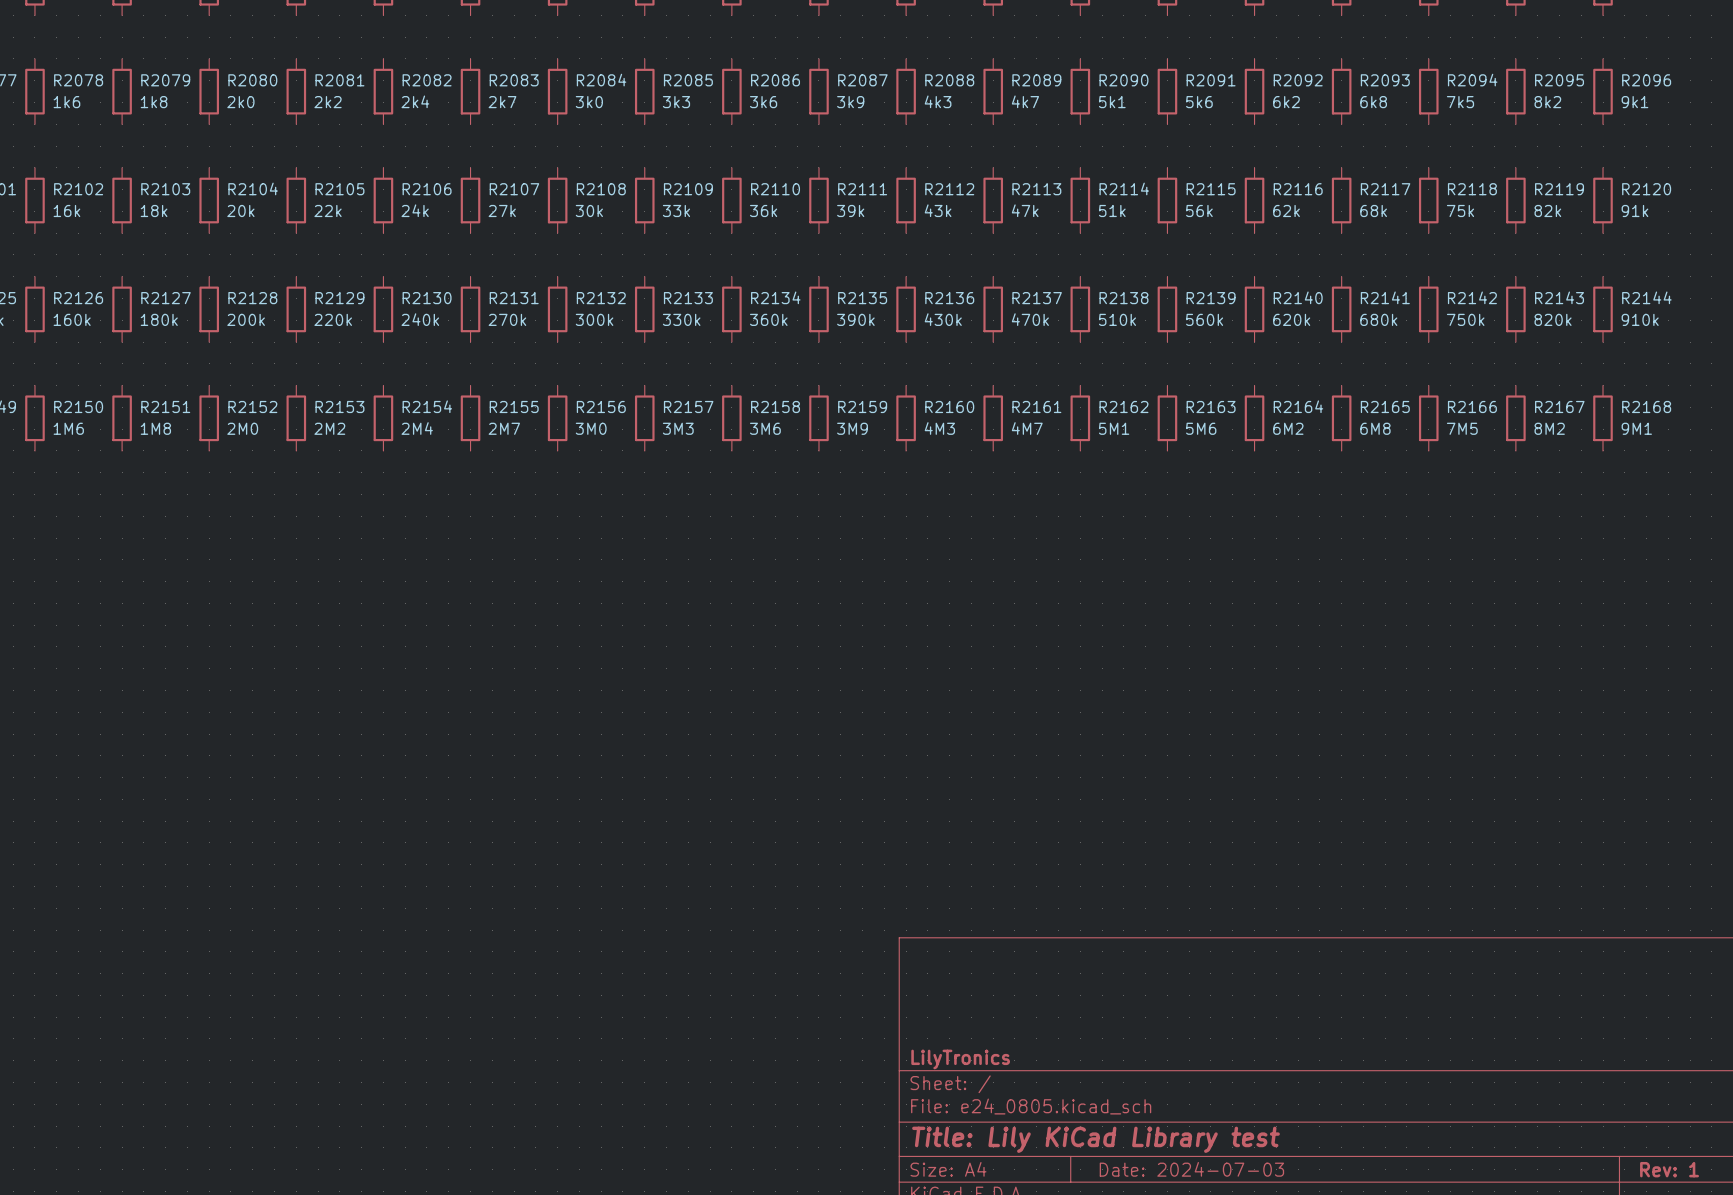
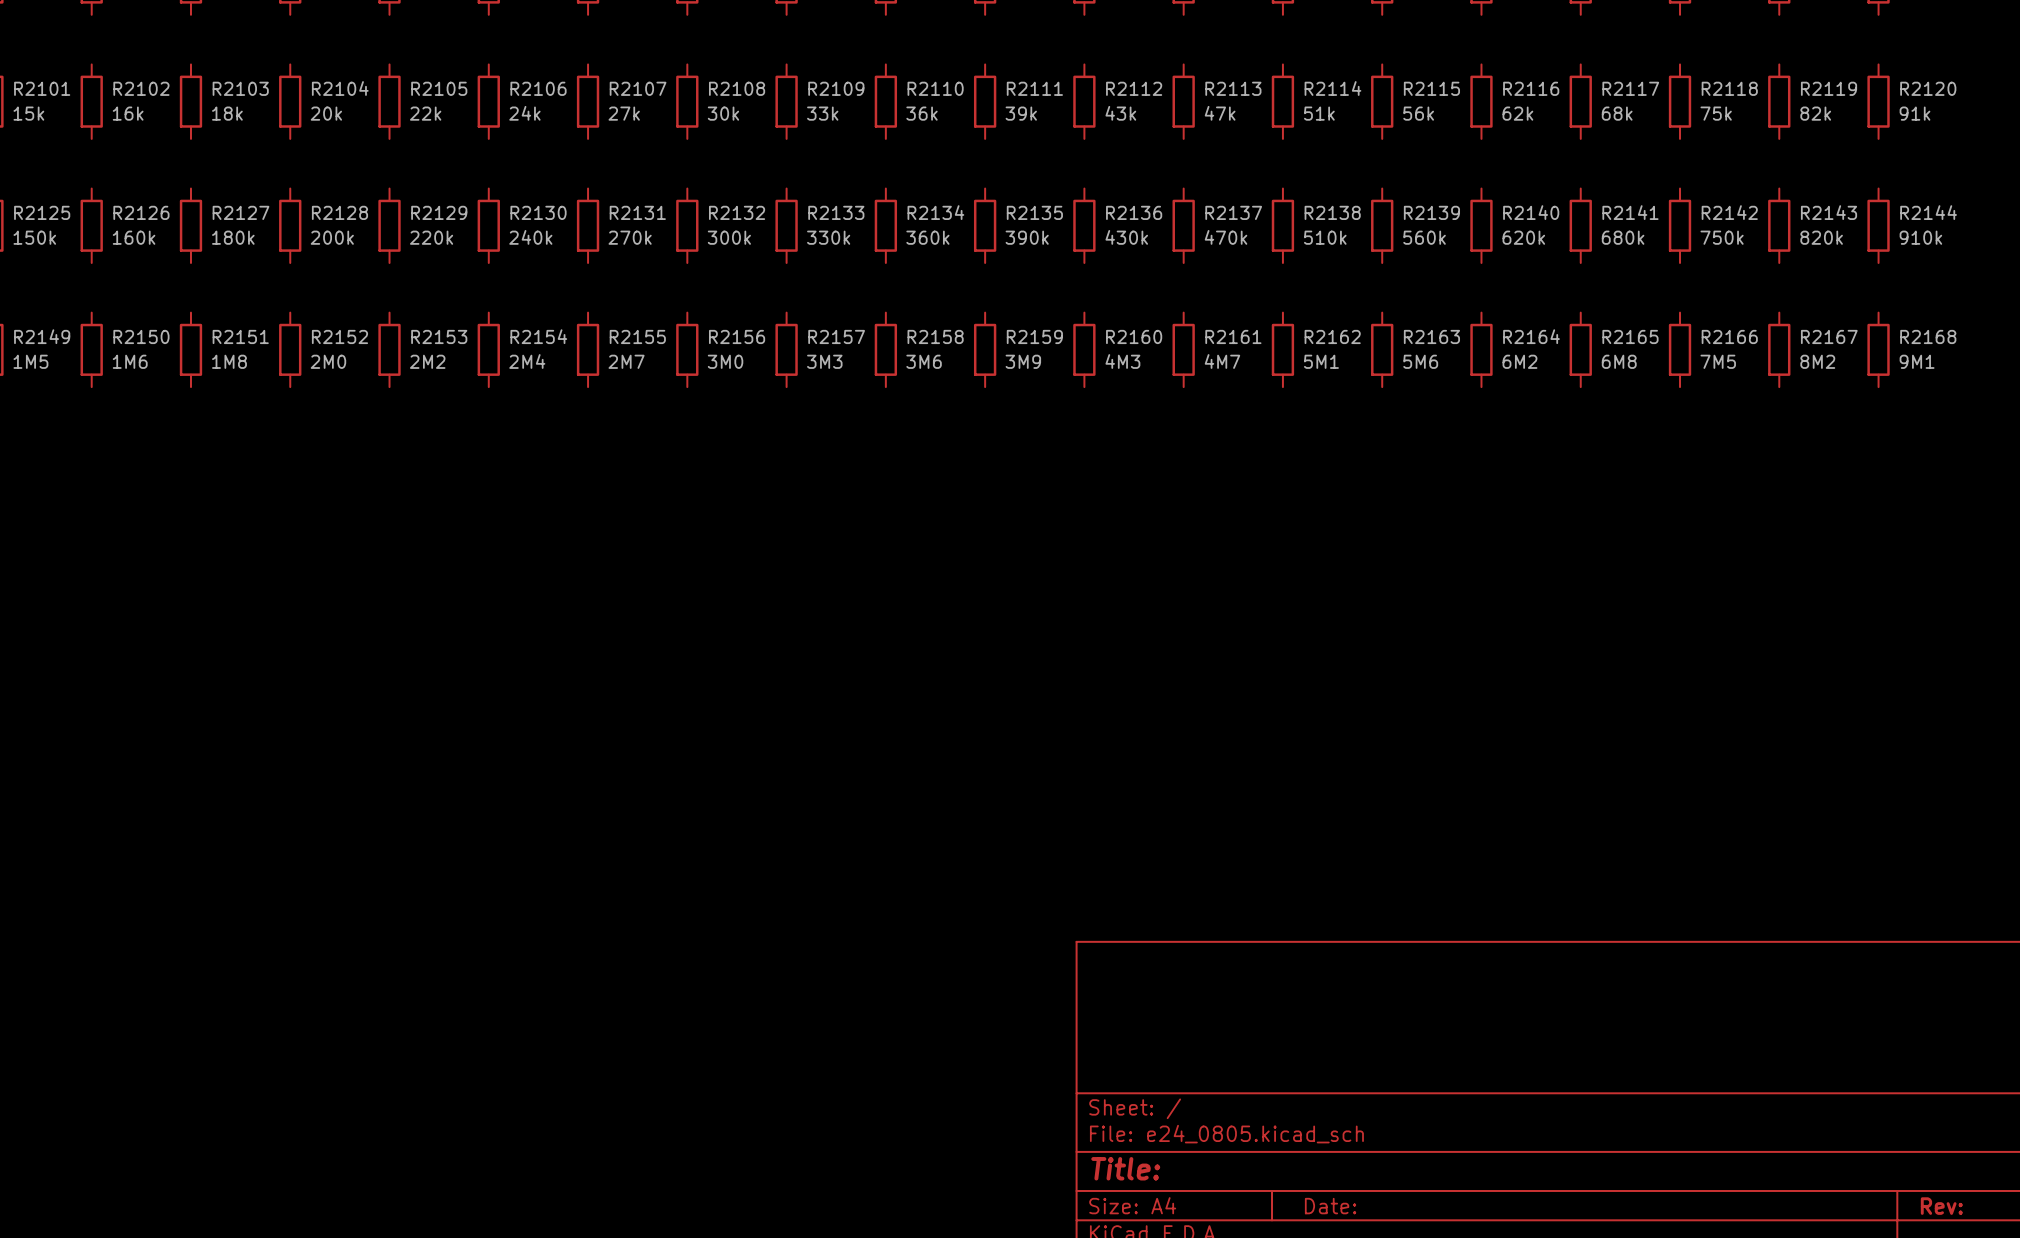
title block: LilyTronics (960, 1059) -> none
title block: Title: Lily KiCad Library test (1095, 1139) -> Title: (1125, 1168)
title block: Date: 2024-07-03 (1191, 1169) -> Date: (1330, 1206)
title block: Rev: 1 (1669, 1169) -> Rev: (1941, 1206)

